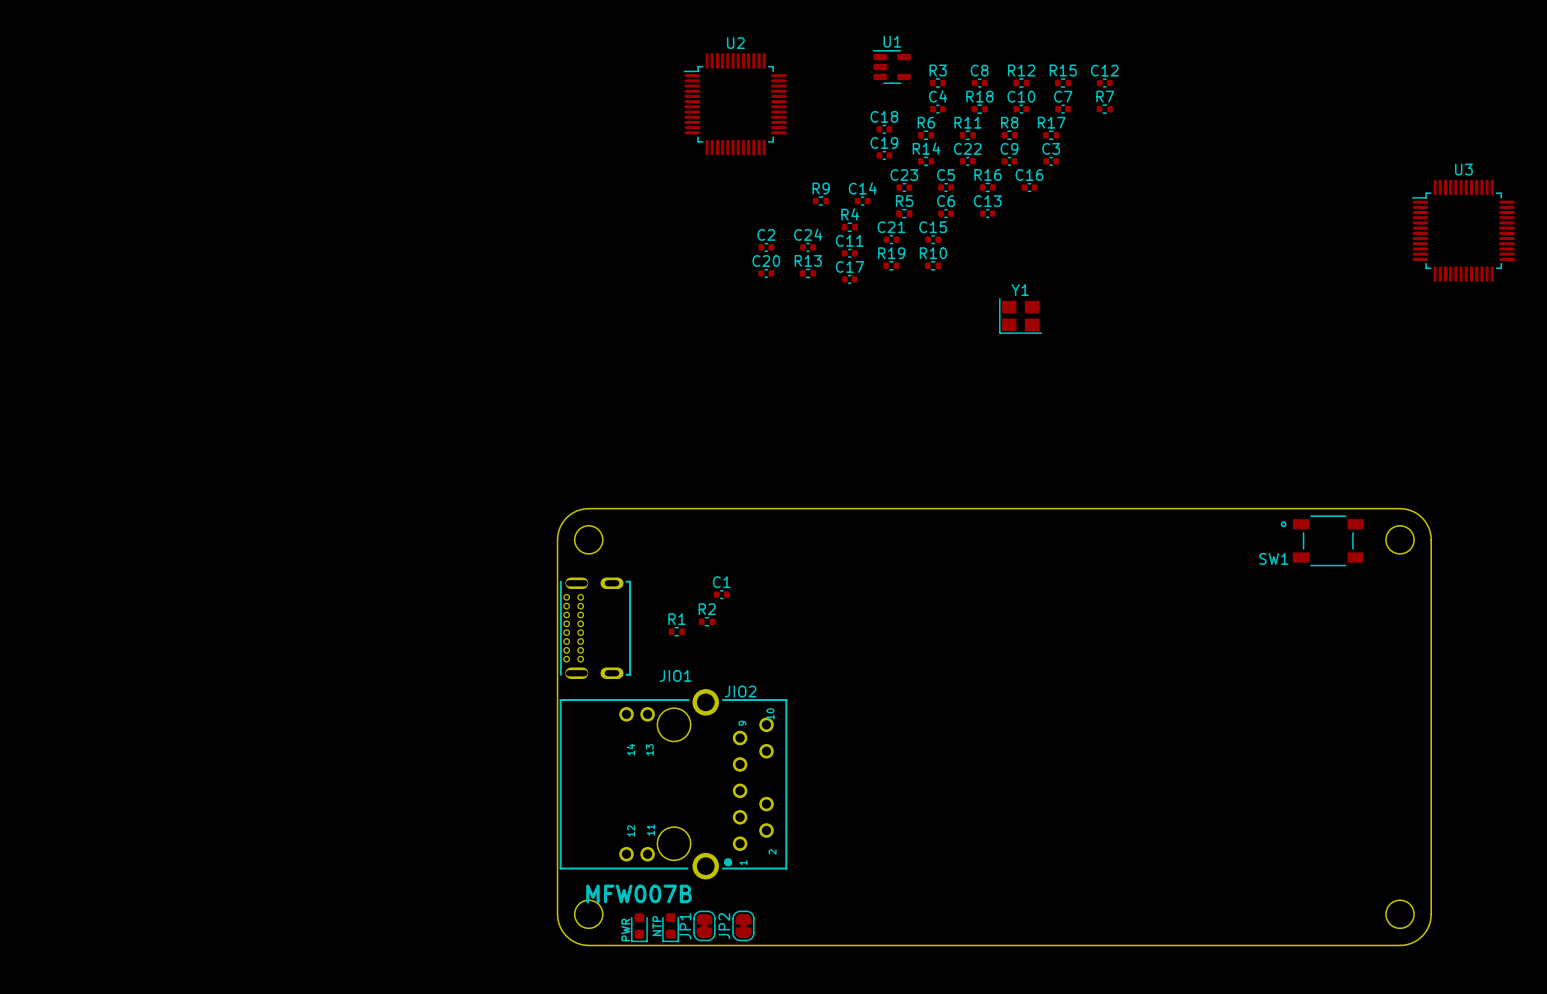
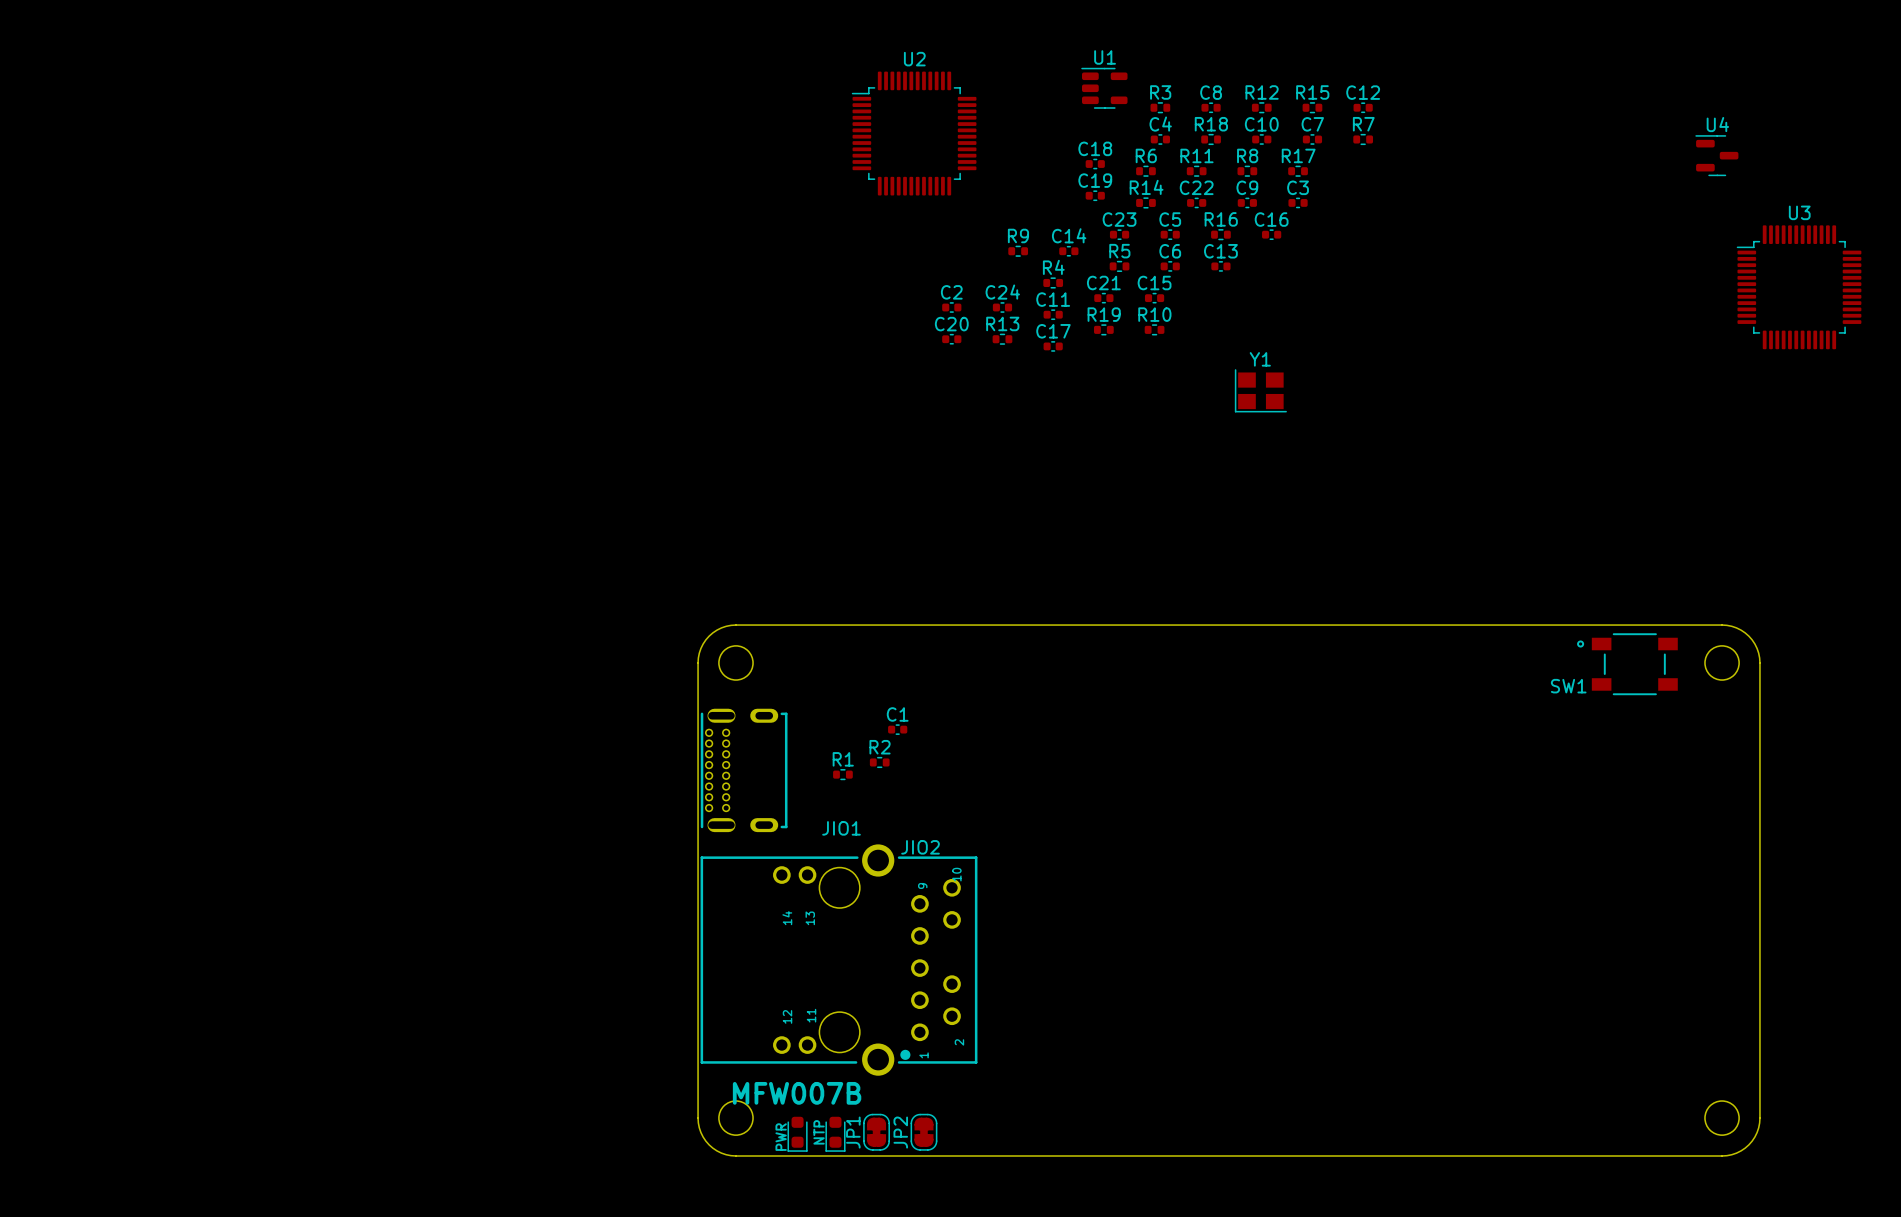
U4: none -> (1716, 155)

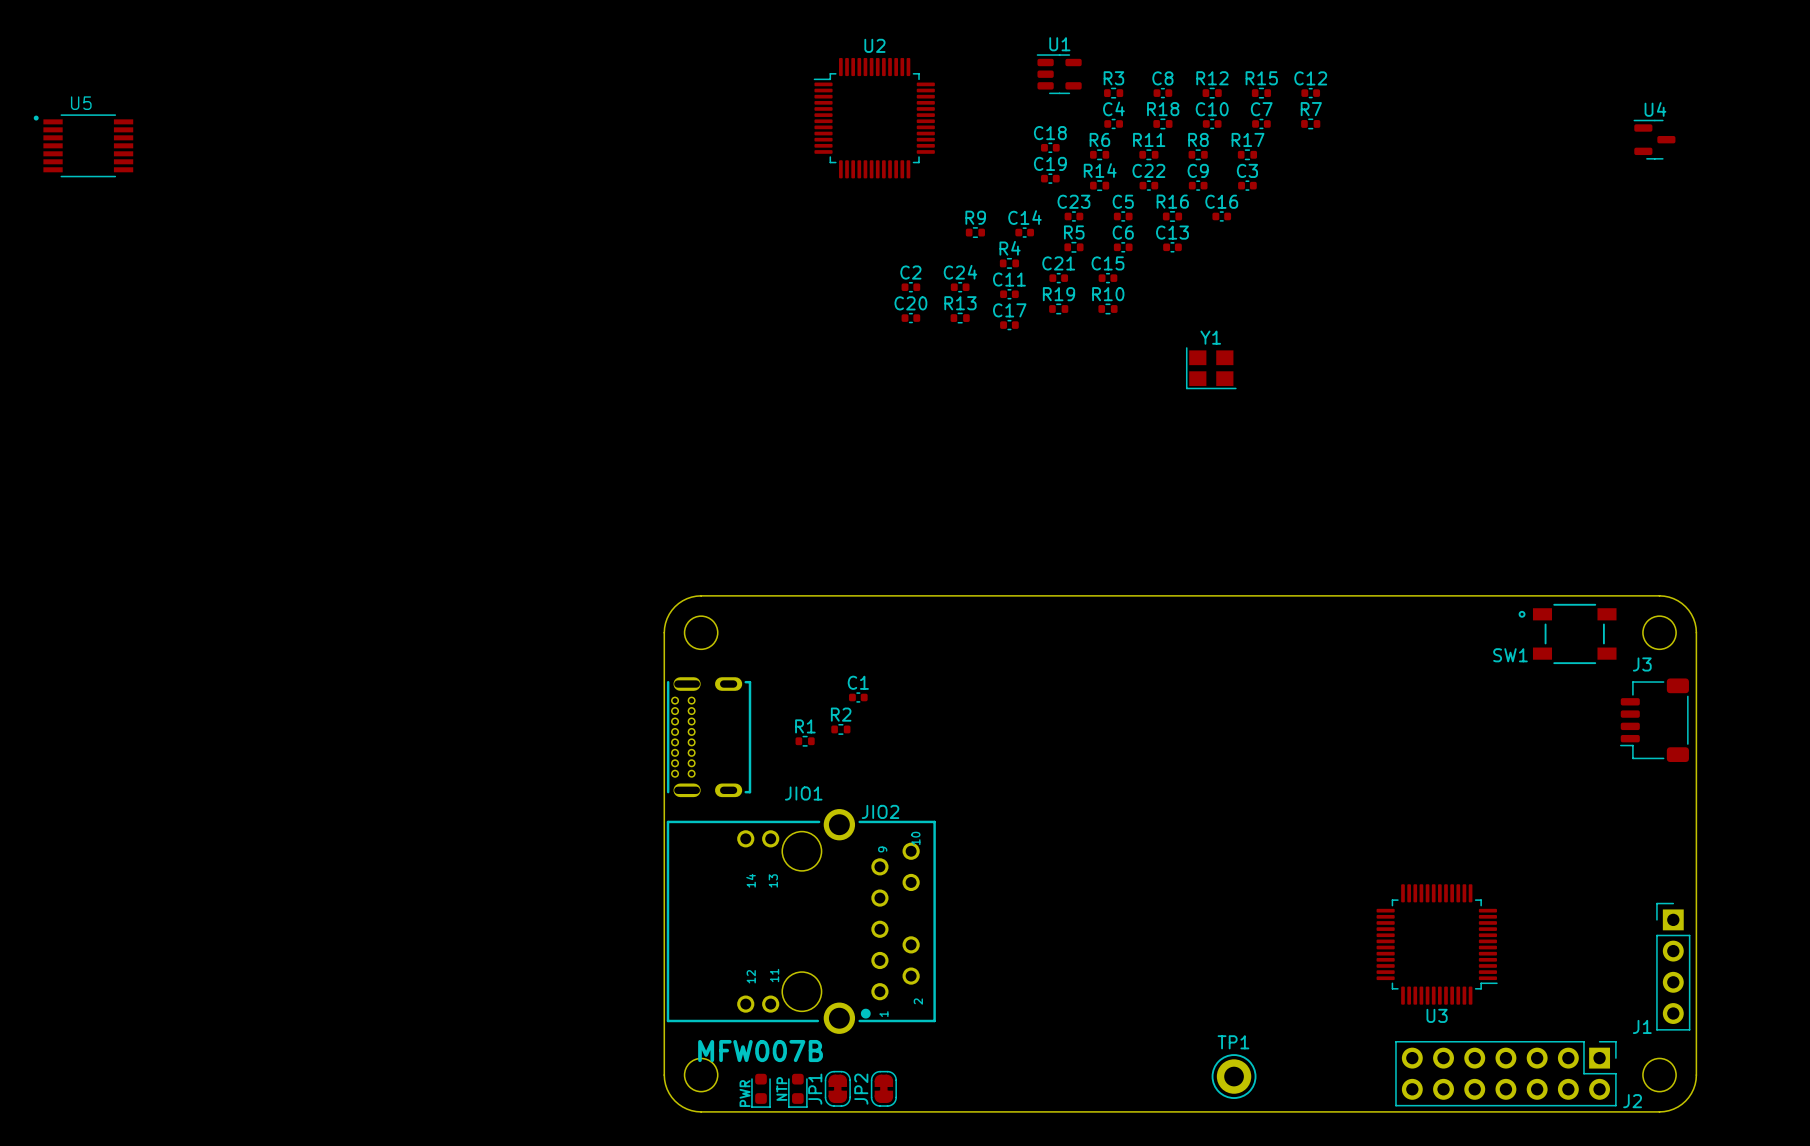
U5: none -> (83, 145)
U3 rotation: 0° (1799, 287) -> 180° (1437, 944)
U3 position: (1799, 287) -> (1437, 944)
J3: none -> (1654, 720)
J1: none -> (1673, 966)
J2: none -> (1505, 1073)
TP1: none -> (1234, 1076)

